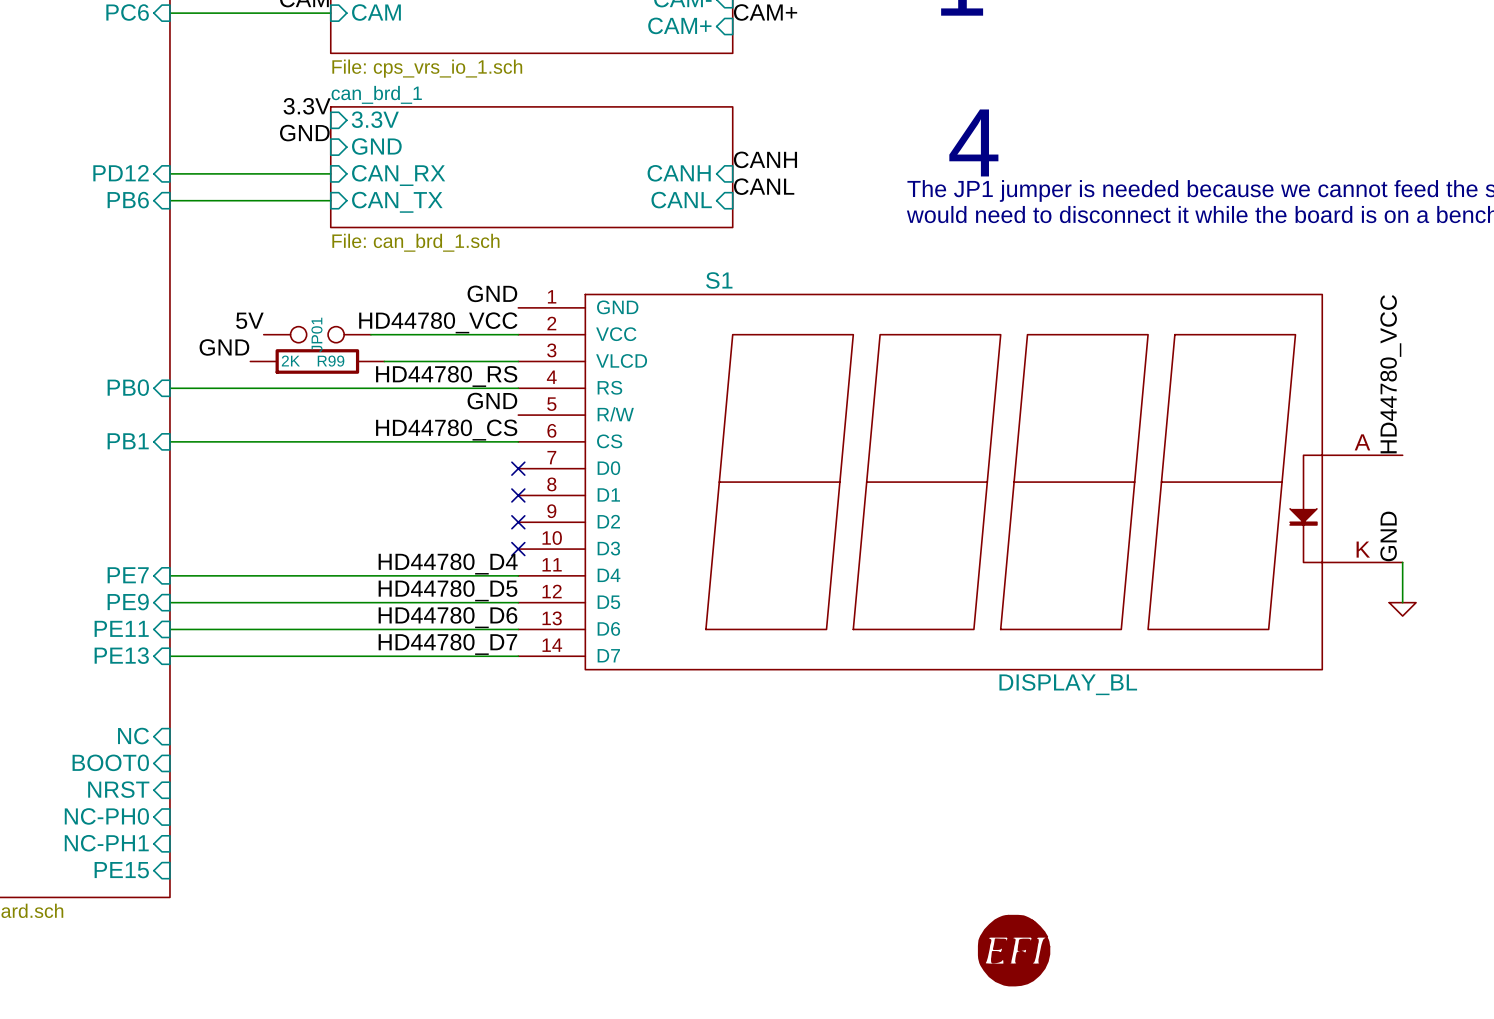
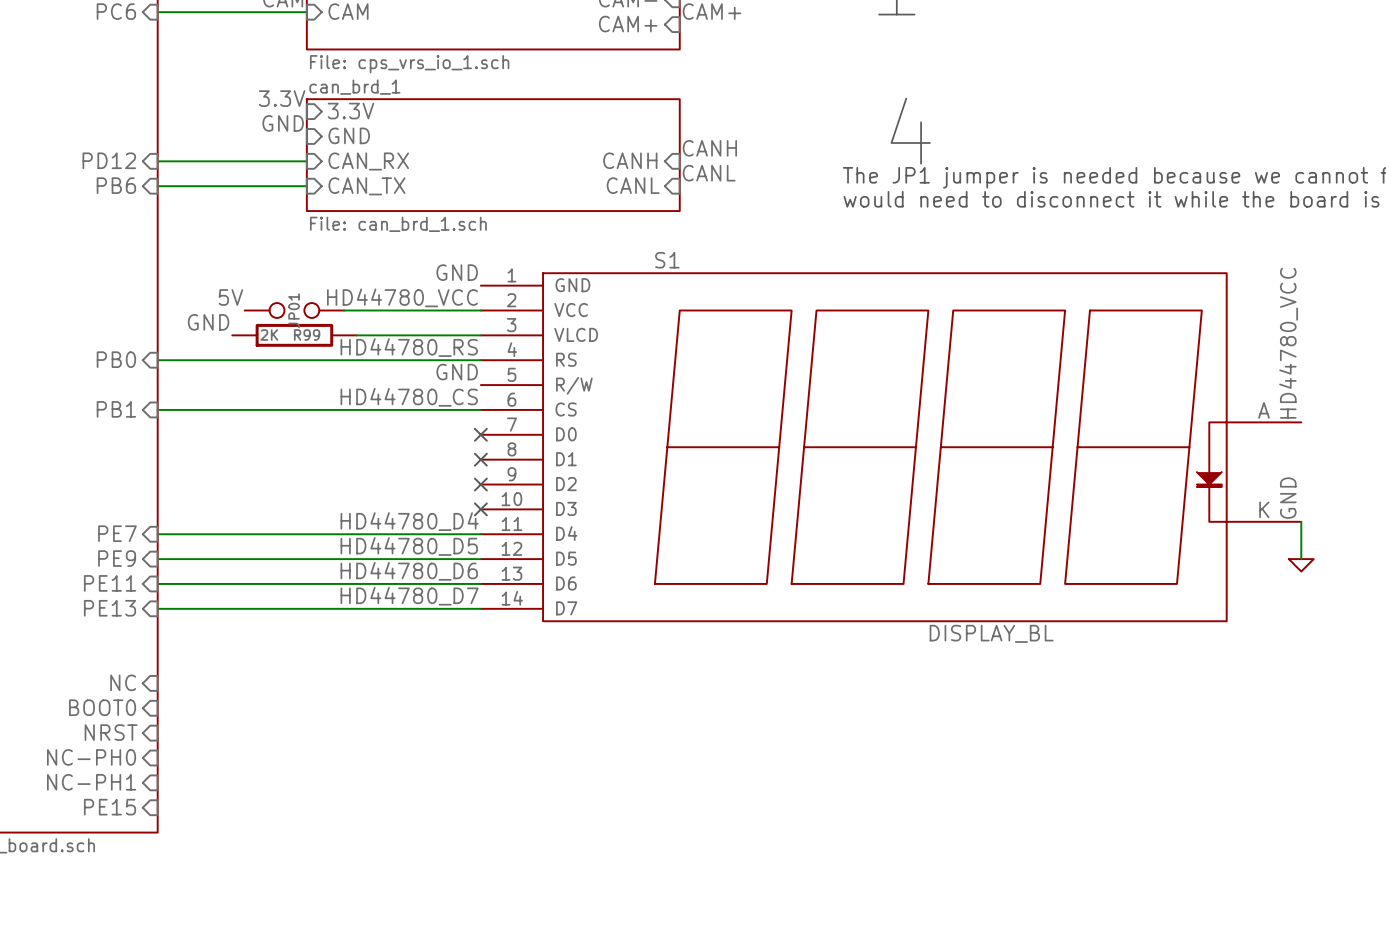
part: (1014, 950) -> none

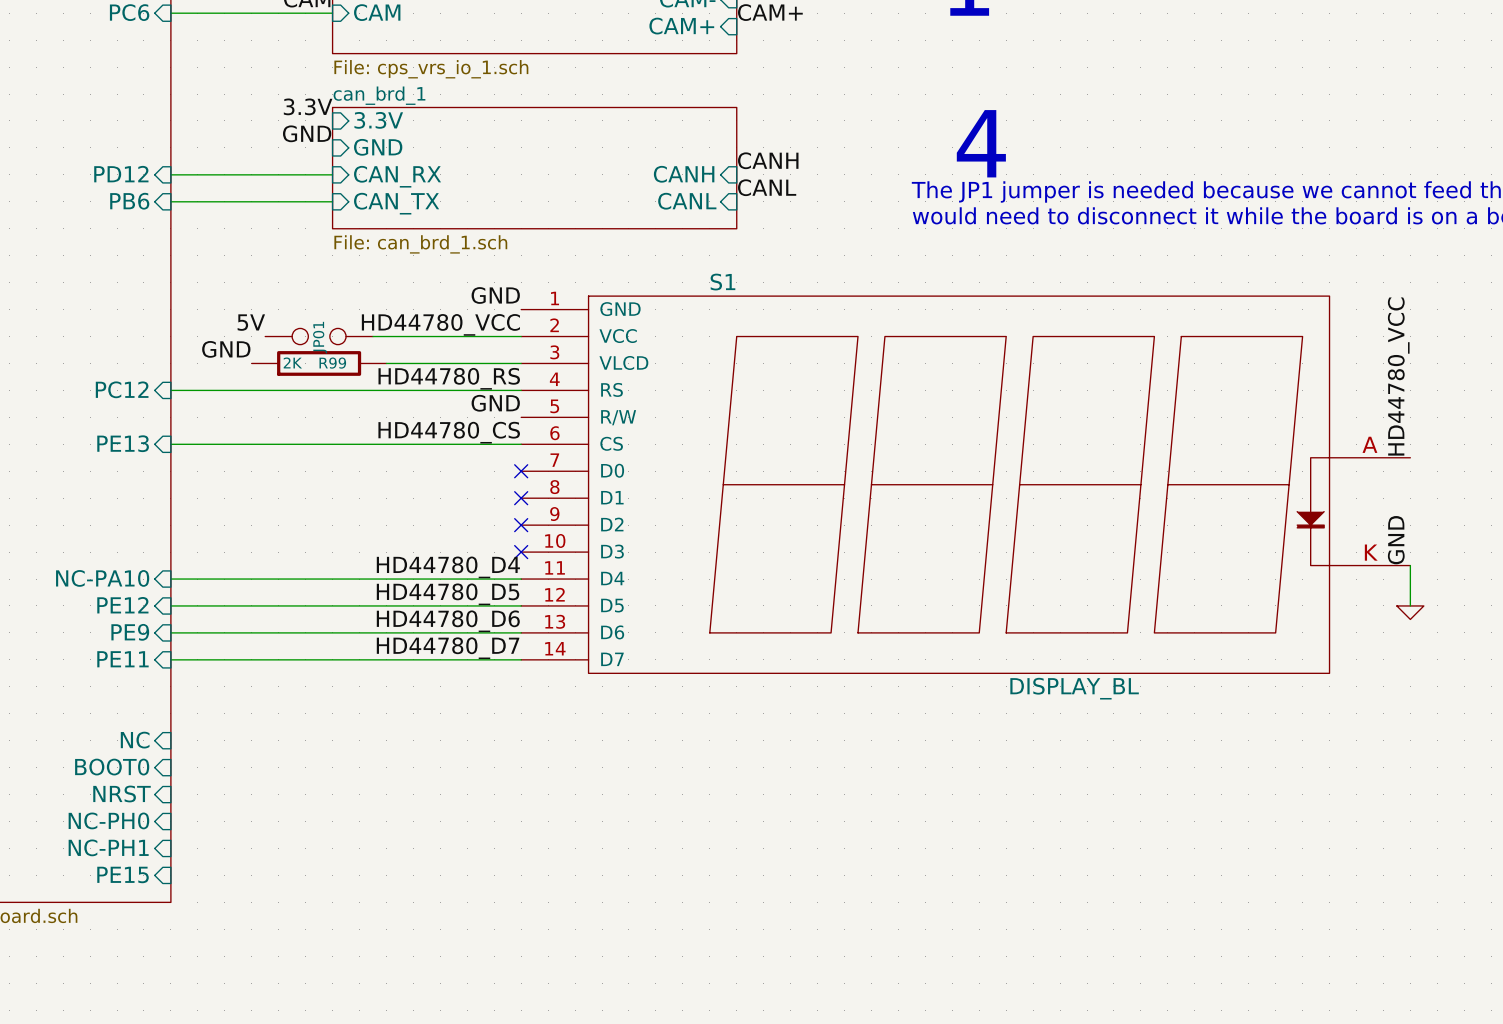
sheet pin: PB0 (116, 359) -> PC12 (122, 389)
sheet pin: PB1 (116, 409) -> PE13 (123, 443)
sheet pin: PE7 (117, 533) -> NC-PA10 (102, 578)
sheet pin: PE9 (117, 558) -> PE12 (122, 605)
sheet pin: PE11 (110, 583) -> PE9 (130, 632)
sheet pin: PE13 (110, 608) -> PE11 (122, 659)

